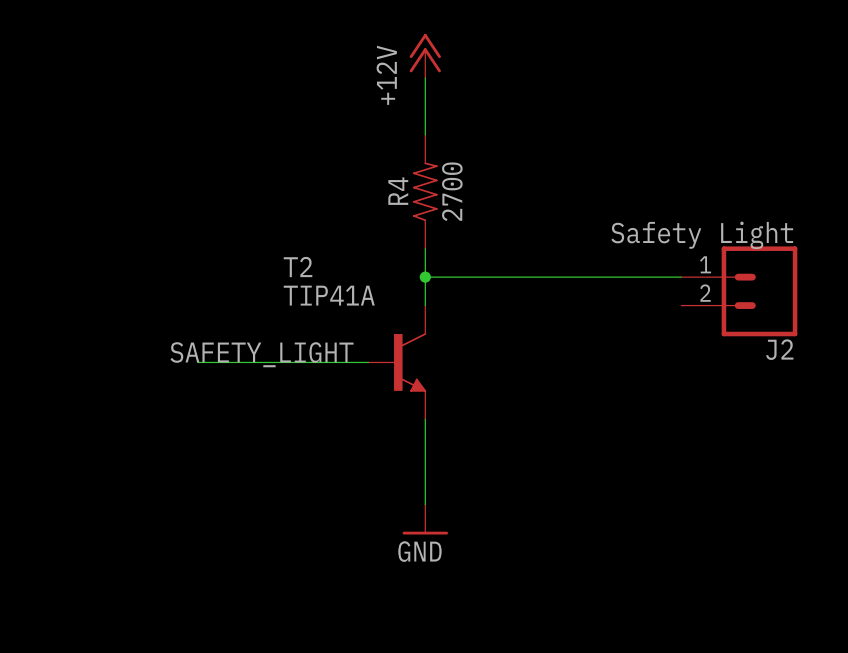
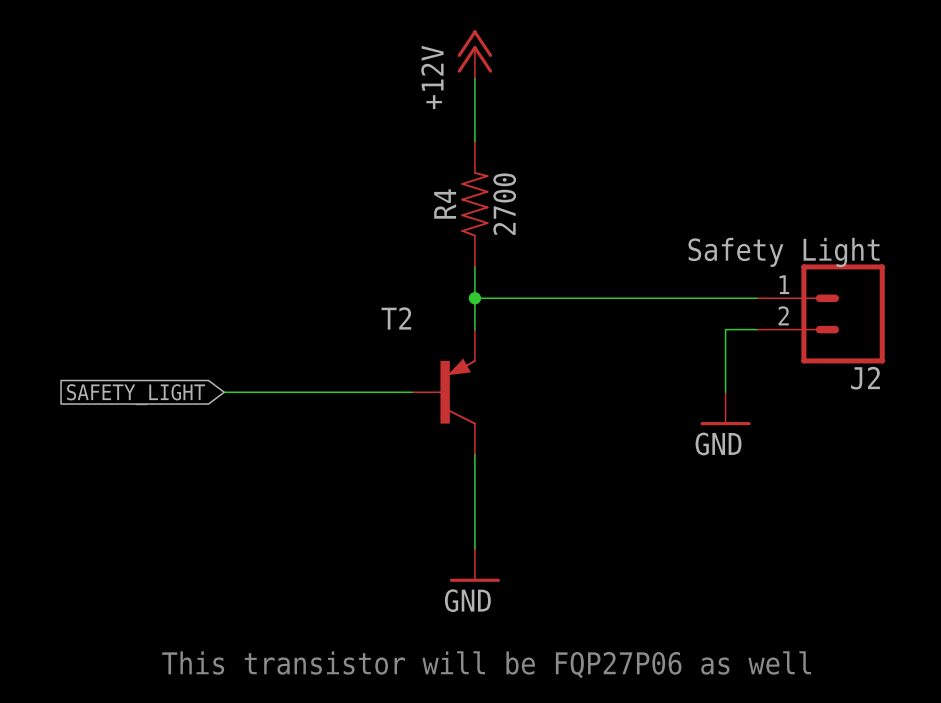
T2 name position: T2 (298, 267) -> T2 (396, 318)
T2 value: TIP41A (329, 295) -> none
T2 symbol: [368, 305, 427, 420] -> [412, 329, 476, 455]
wire: none -> (756, 329) (725, 329) (725, 392)
label: SAFETY_LIGHT (262, 354) -> none
global label: none -> SAFETY_LIGHT (136, 394)
power symbol: none -> GND (725, 408)
text: none -> This transistor will be FQP27P06 as well (486, 664)

